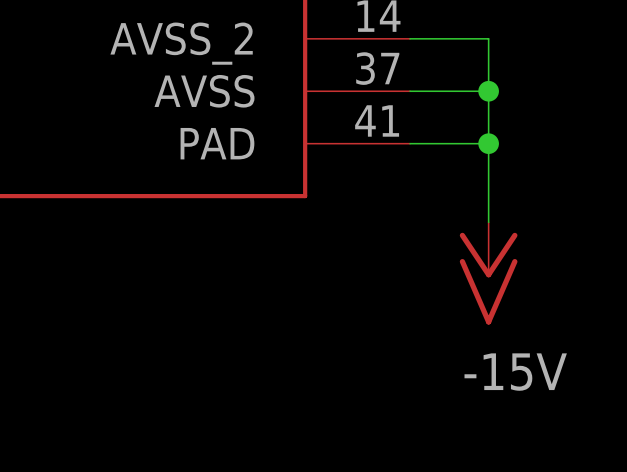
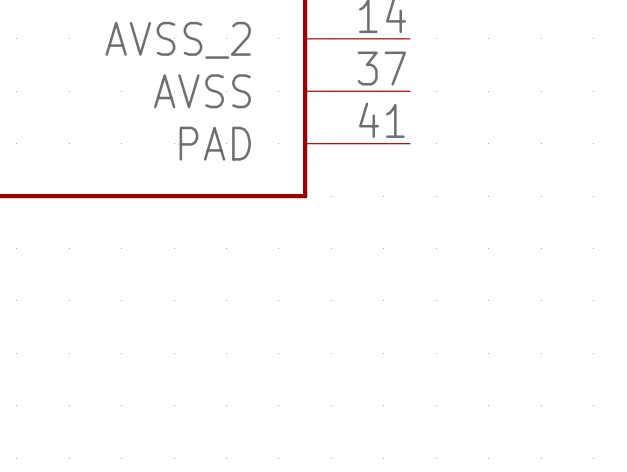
wire: (409, 38) (488, 38) (488, 222) -> none
wire: (409, 91) (488, 91) -> none
junction: (488, 91) -> none
wire: (409, 143) (488, 143) -> none
junction: (488, 143) -> none
power symbol: -15V (488, 273) -> none

